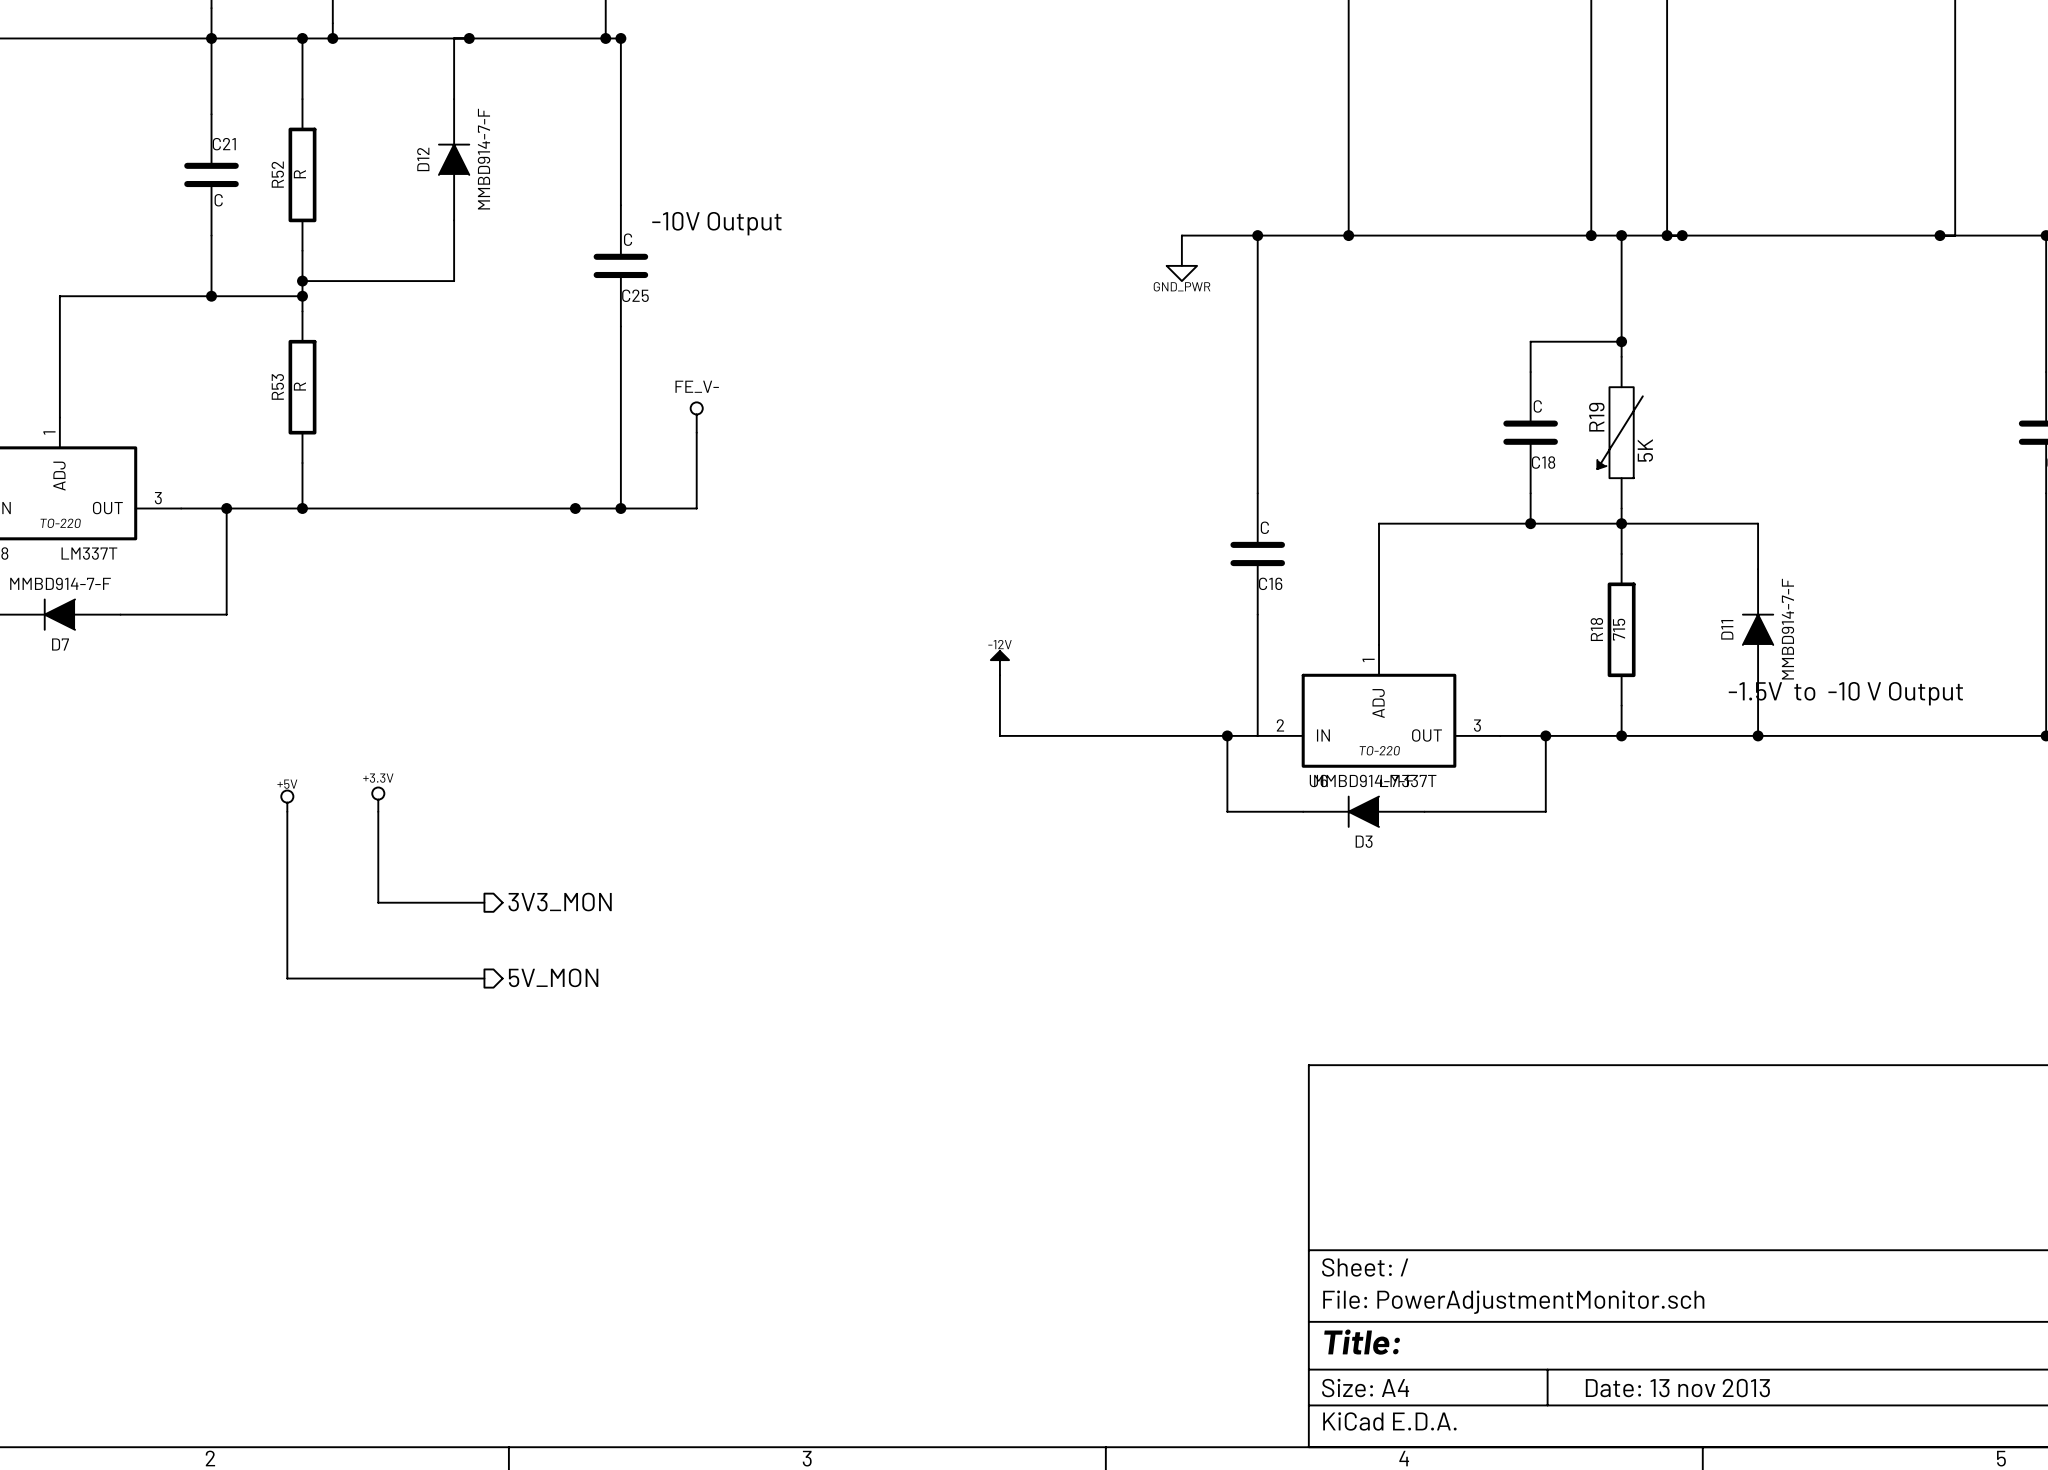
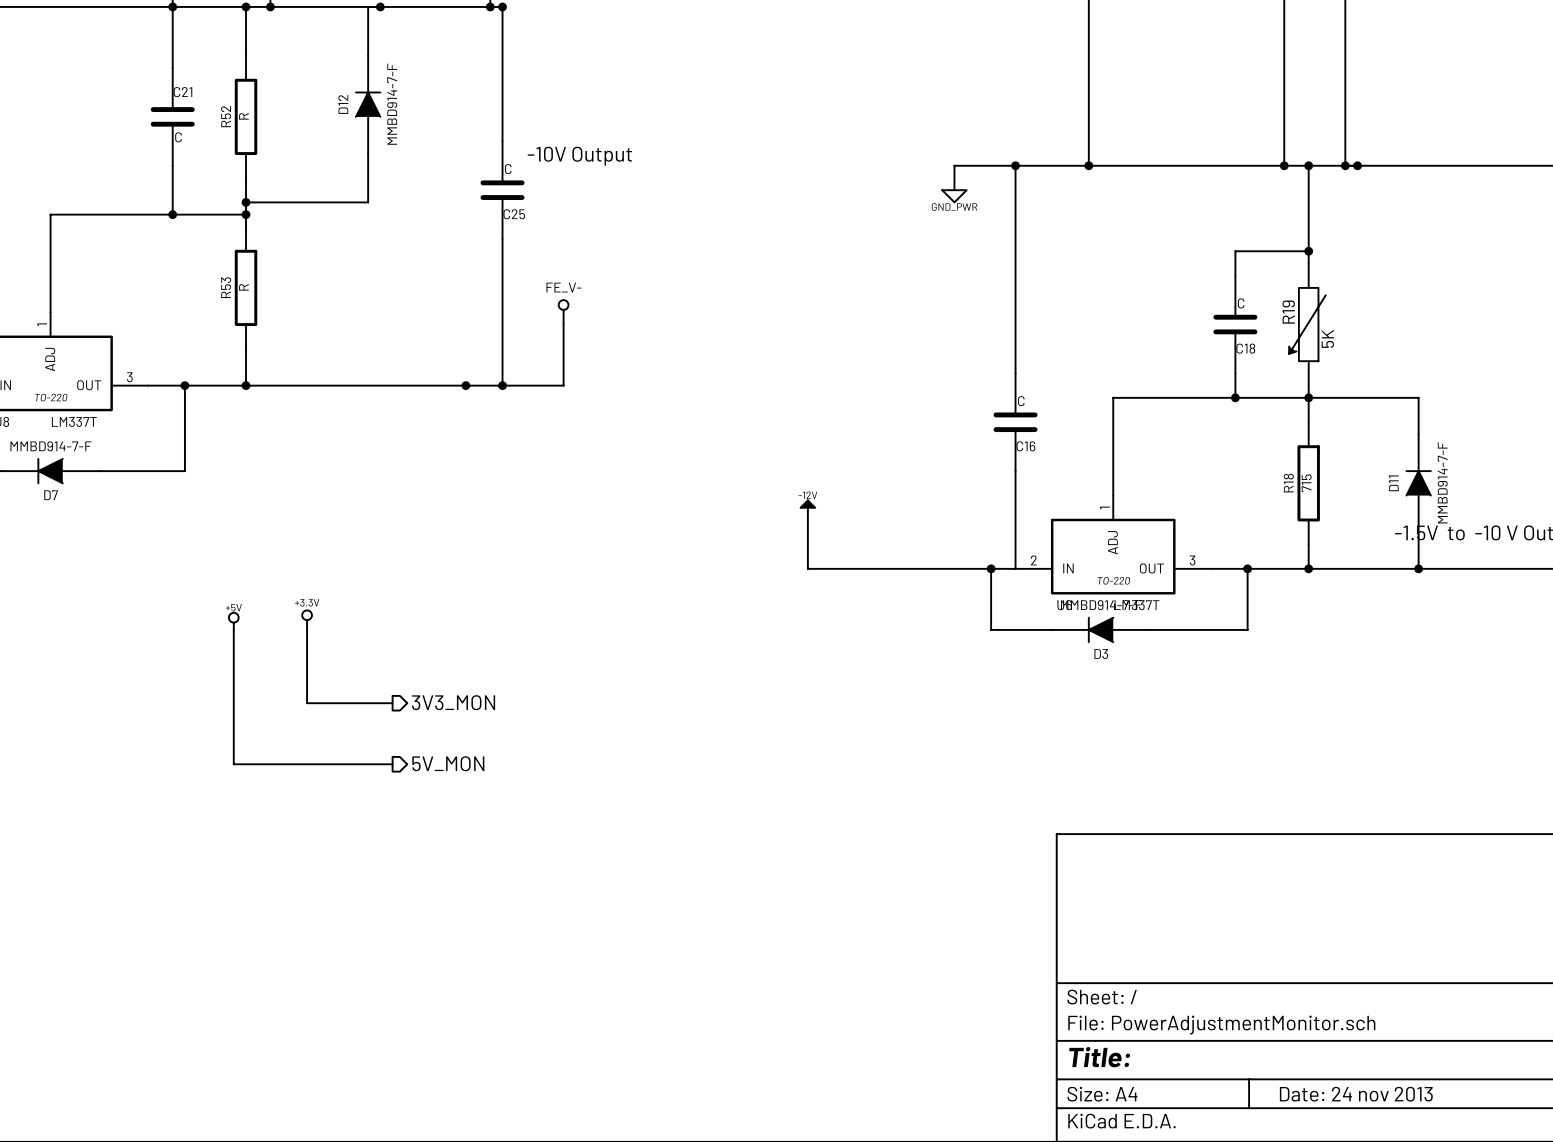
title block: Date: 13 nov 2013 (1677, 1388) -> Date: 24 nov 2013 (1356, 1094)

